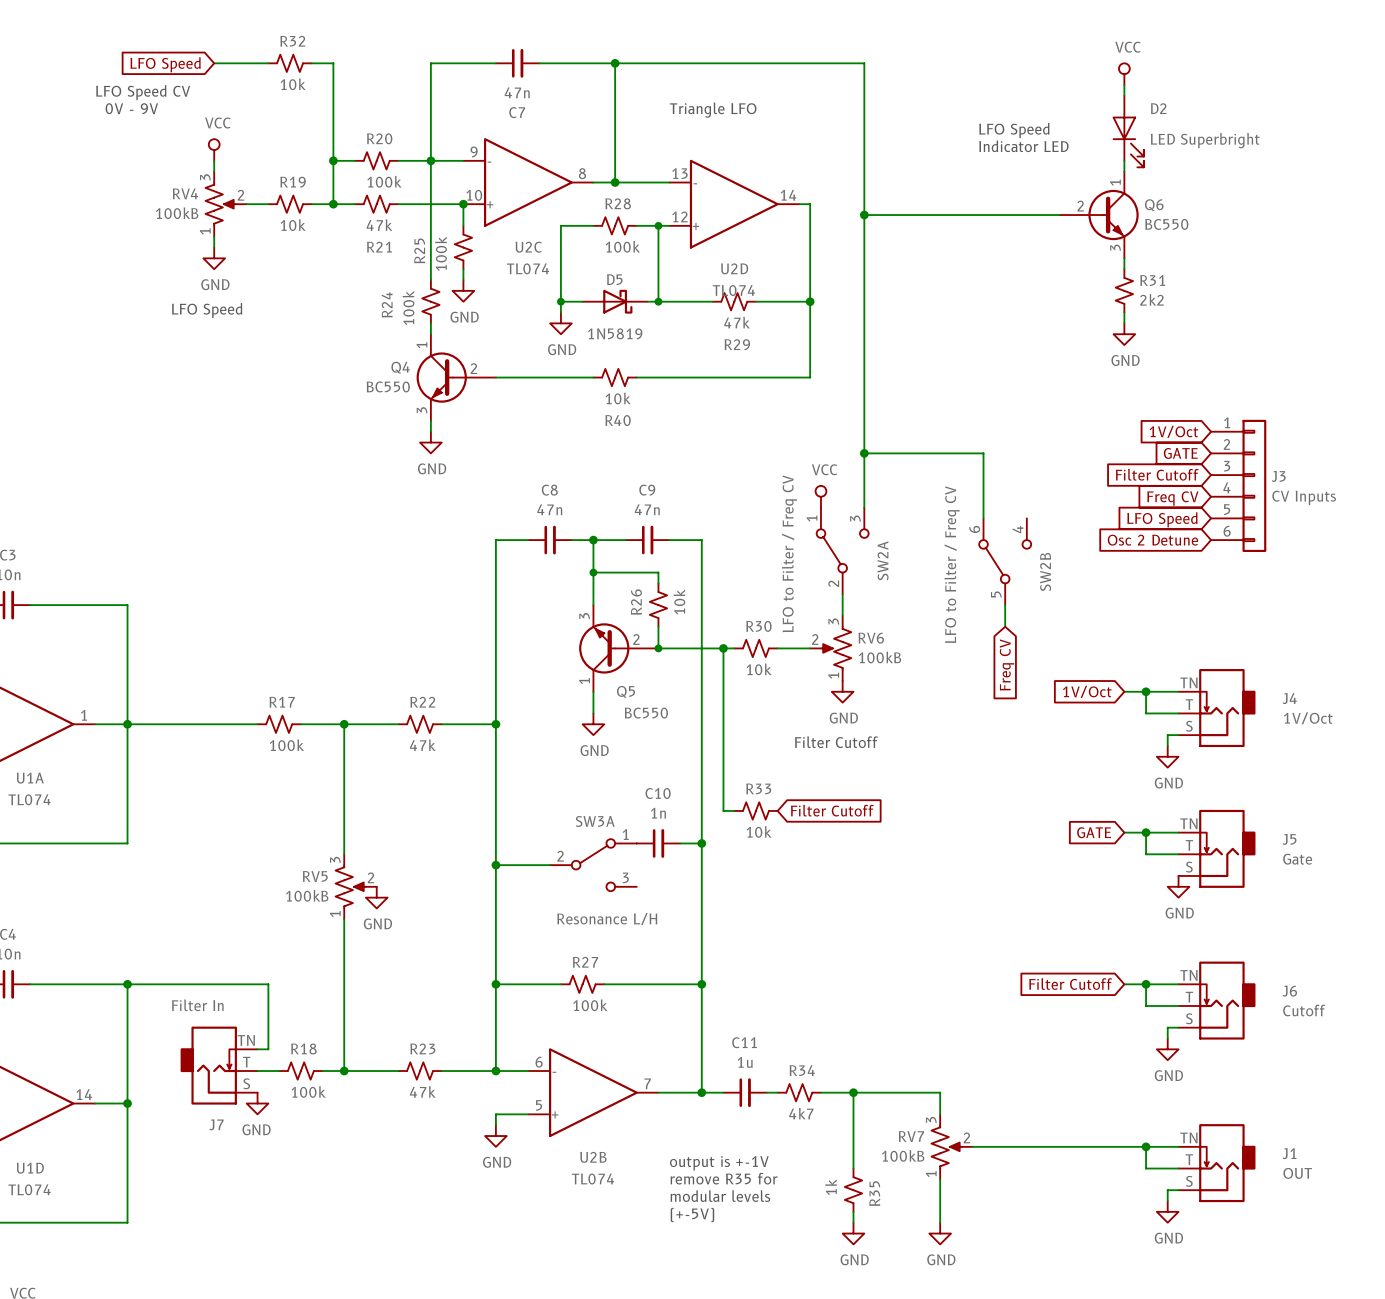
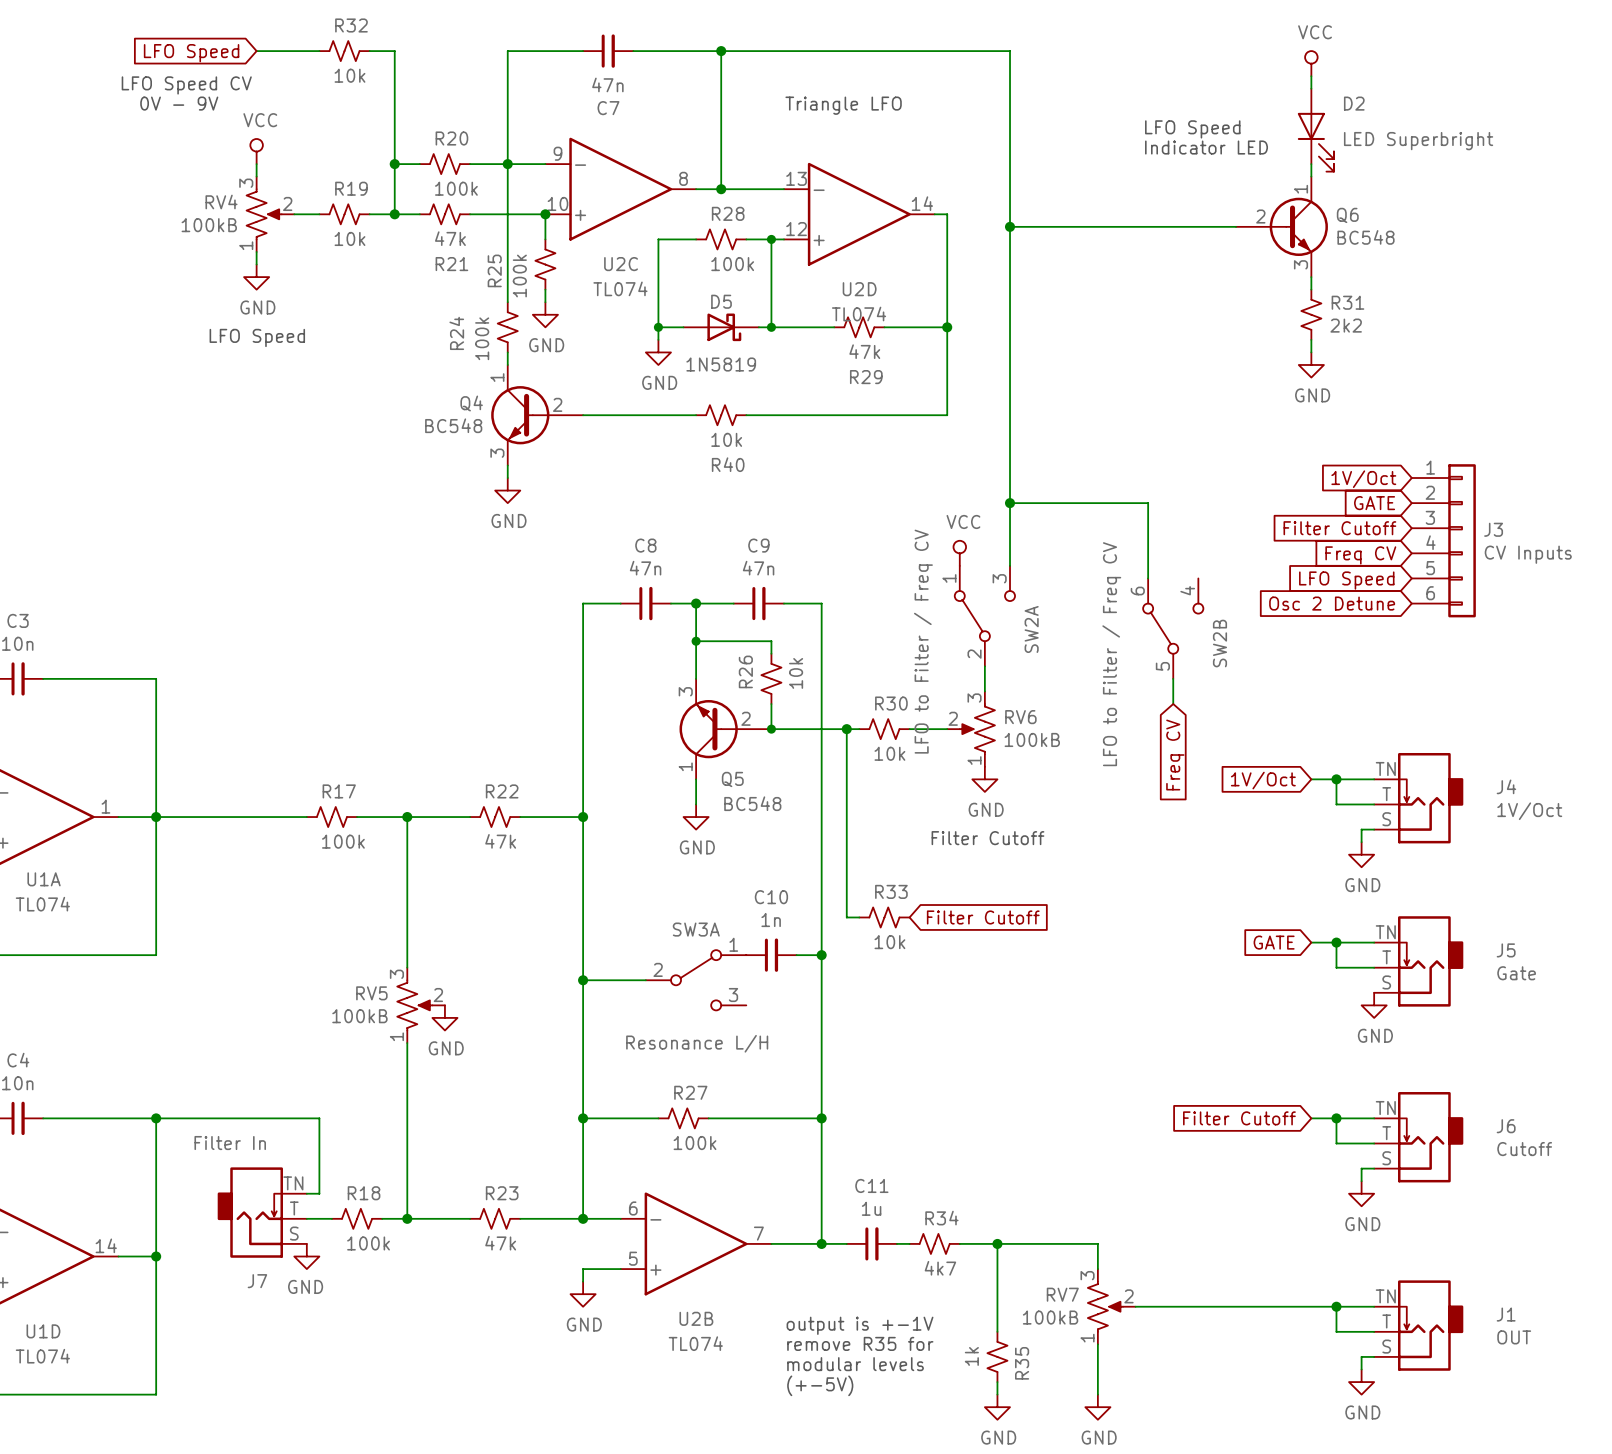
Q6 value: BC550 (1166, 224) -> BC548 (1366, 237)
Q4 value: BC550 (388, 386) -> BC548 (453, 425)
Q5 value: BC550 (646, 713) -> BC548 (752, 803)

